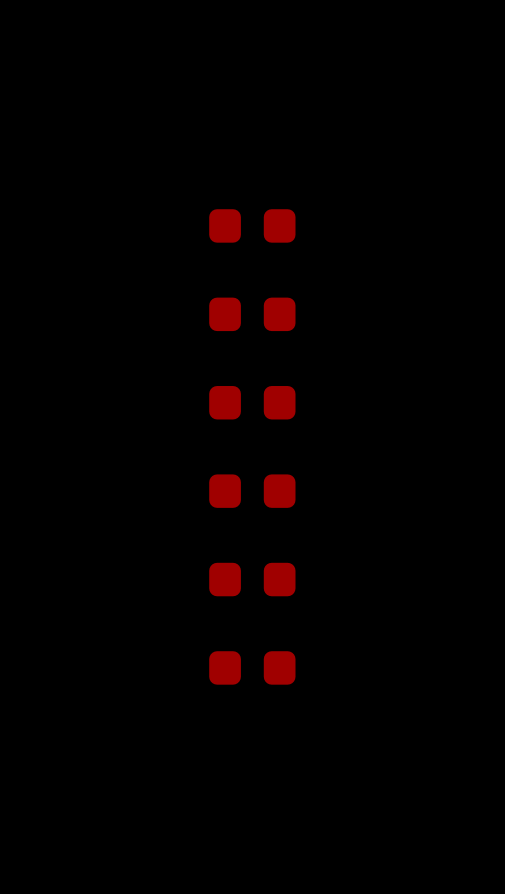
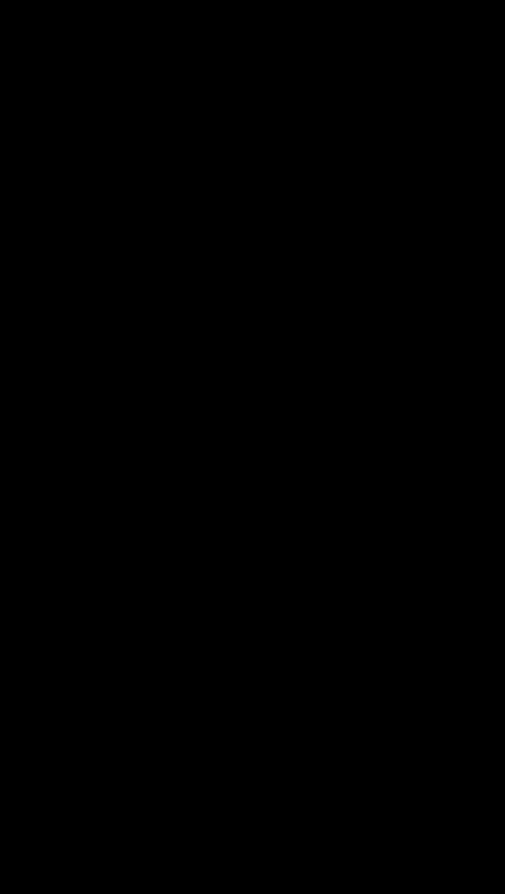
part: (252, 225) -> none
part: (252, 314) -> none
part: (252, 402) -> none
part: (252, 491) -> none
part: (252, 579) -> none
part: (252, 667) -> none

